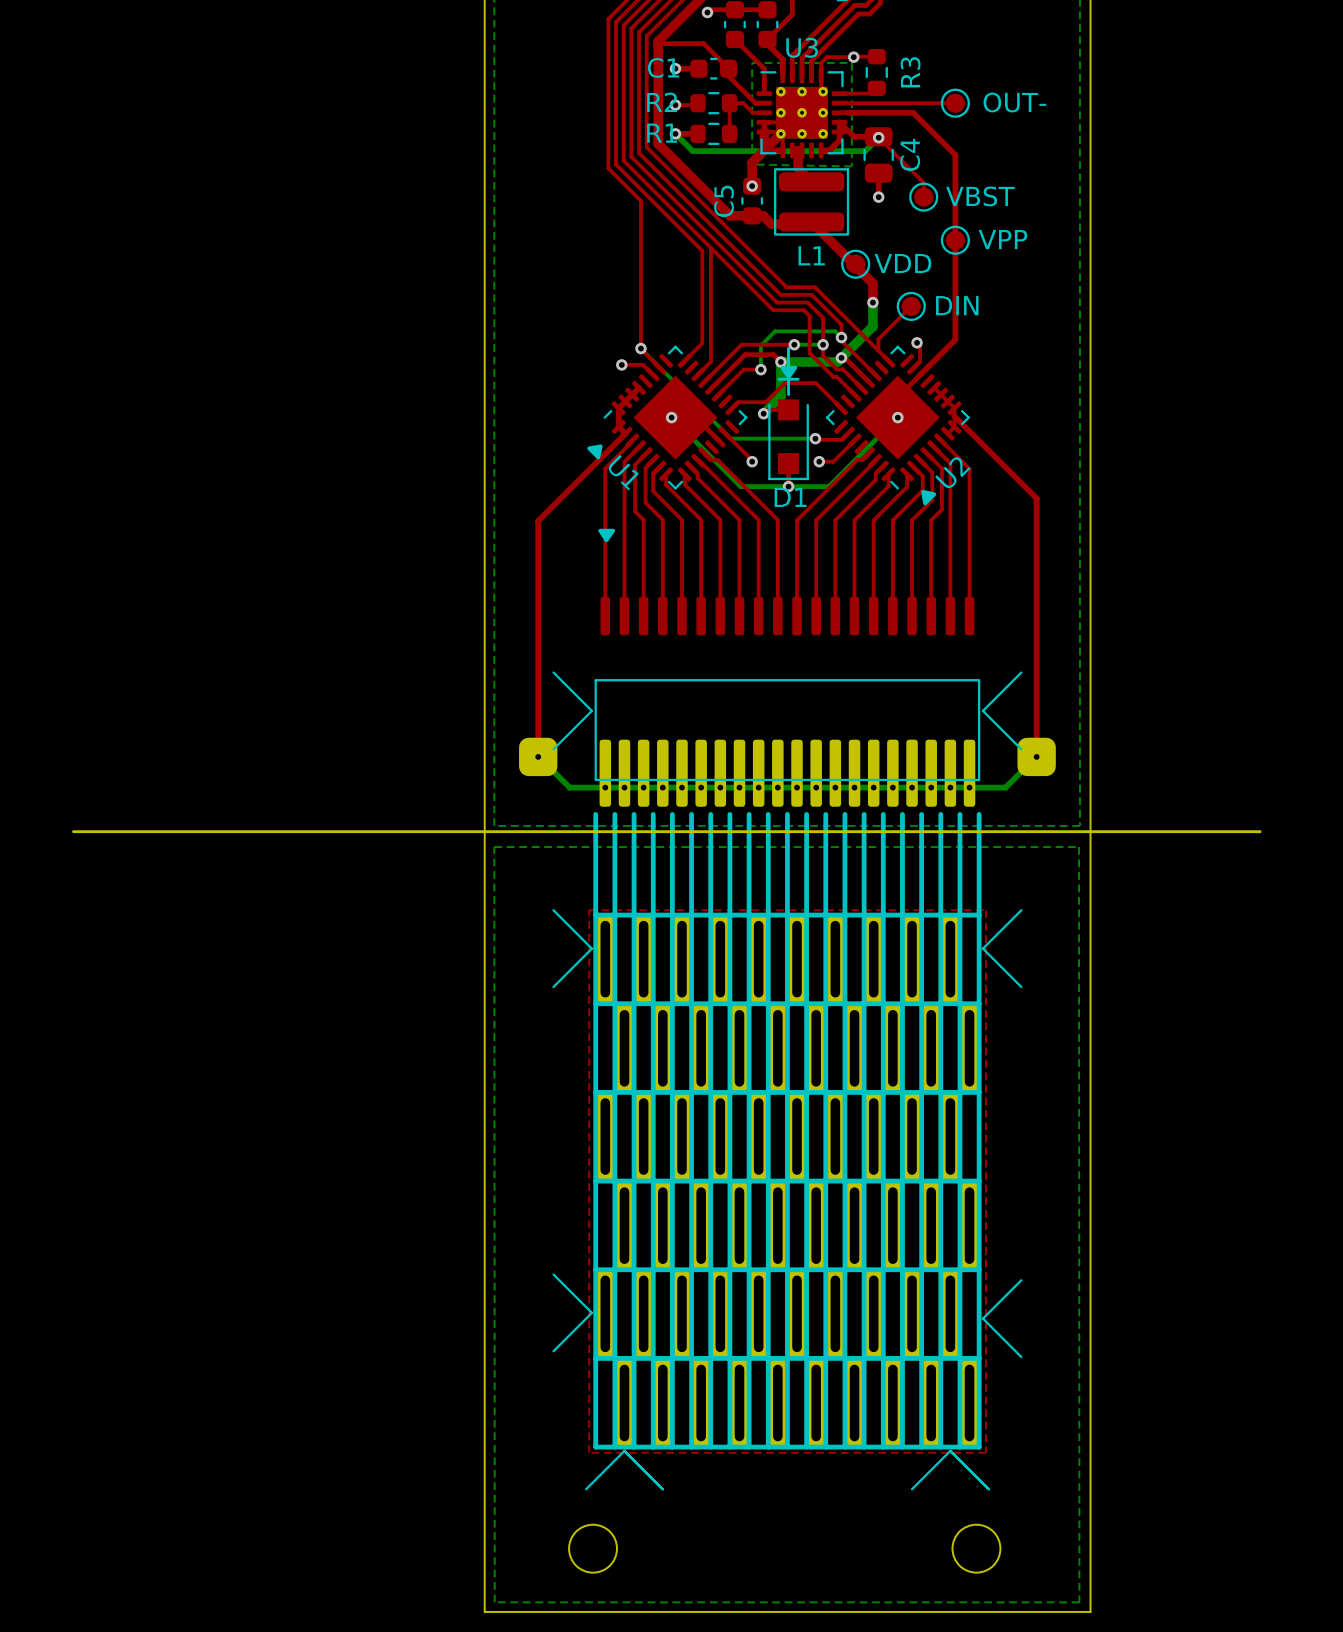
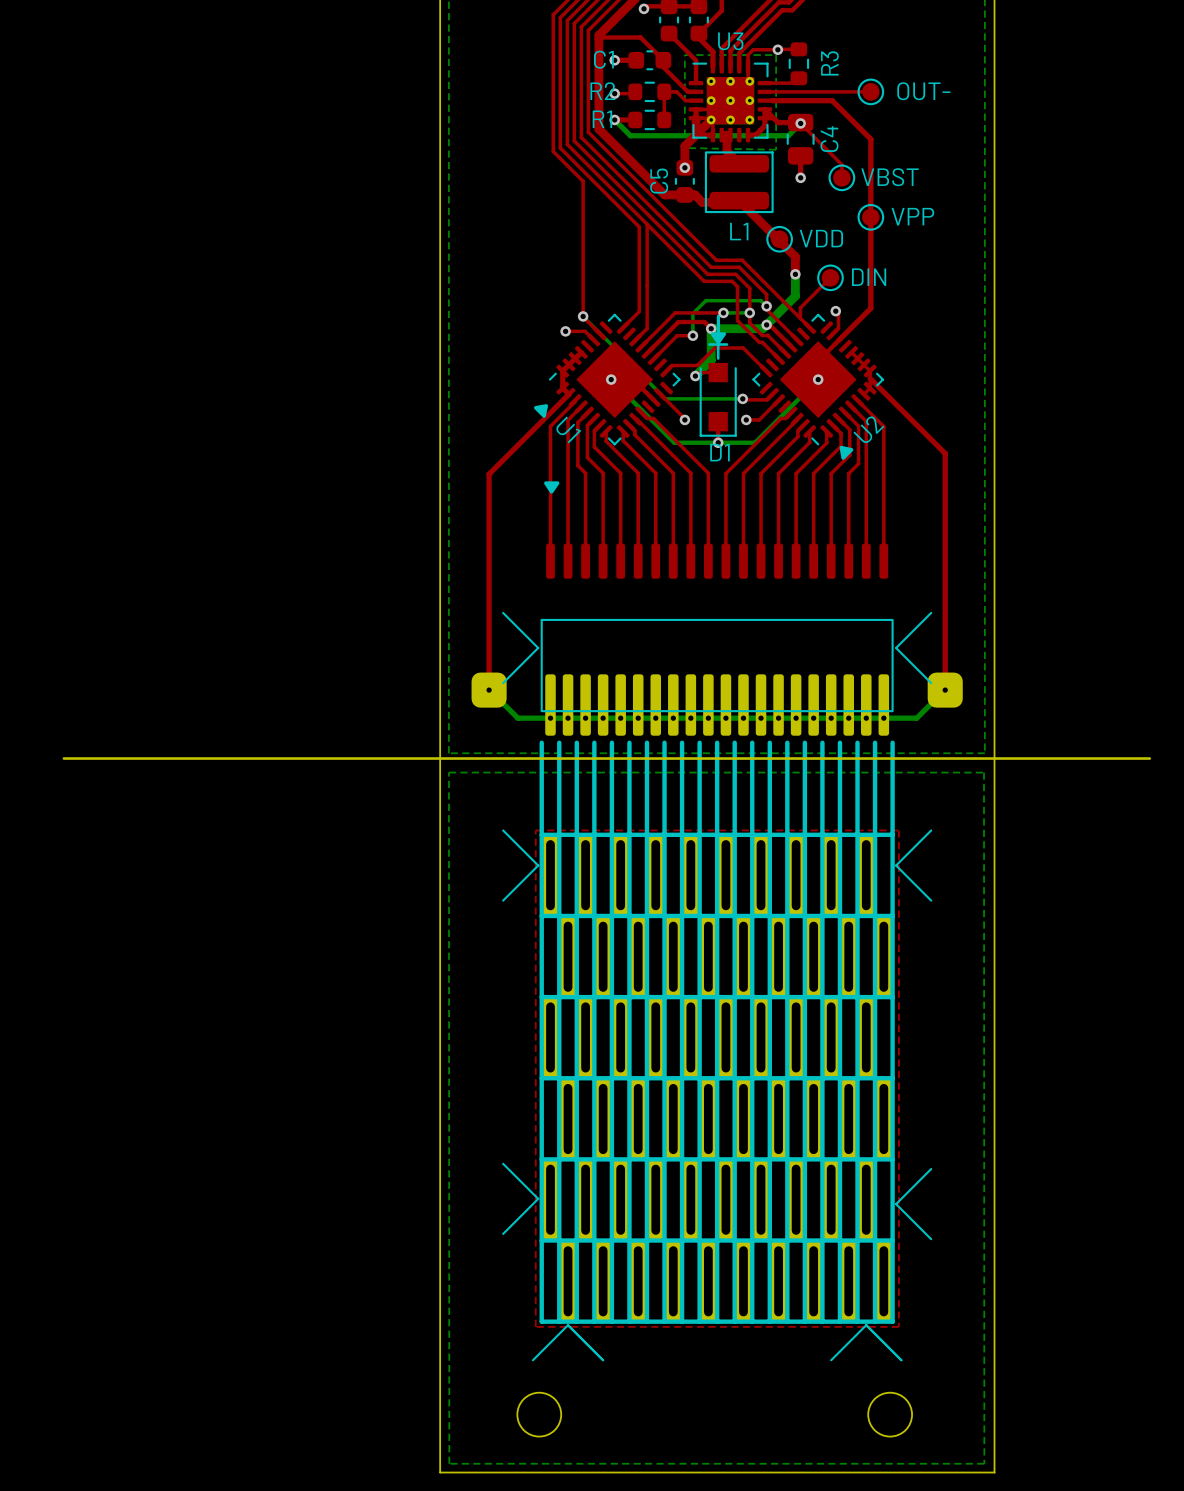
OUT- text: none -> OUT- (923, 91)
OUT- name: OUT- (1014, 102) -> none
VBST text: none -> VBST (890, 177)
VBST name: VBST (980, 196) -> none
VPP text: none -> VPP (912, 216)
VPP name: VPP (1002, 239) -> none
VDD text: none -> VDD (821, 238)
VDD name: VDD (902, 263) -> none
DIN text: none -> DIN (869, 277)
DIN name: DIN (957, 305) -> none

